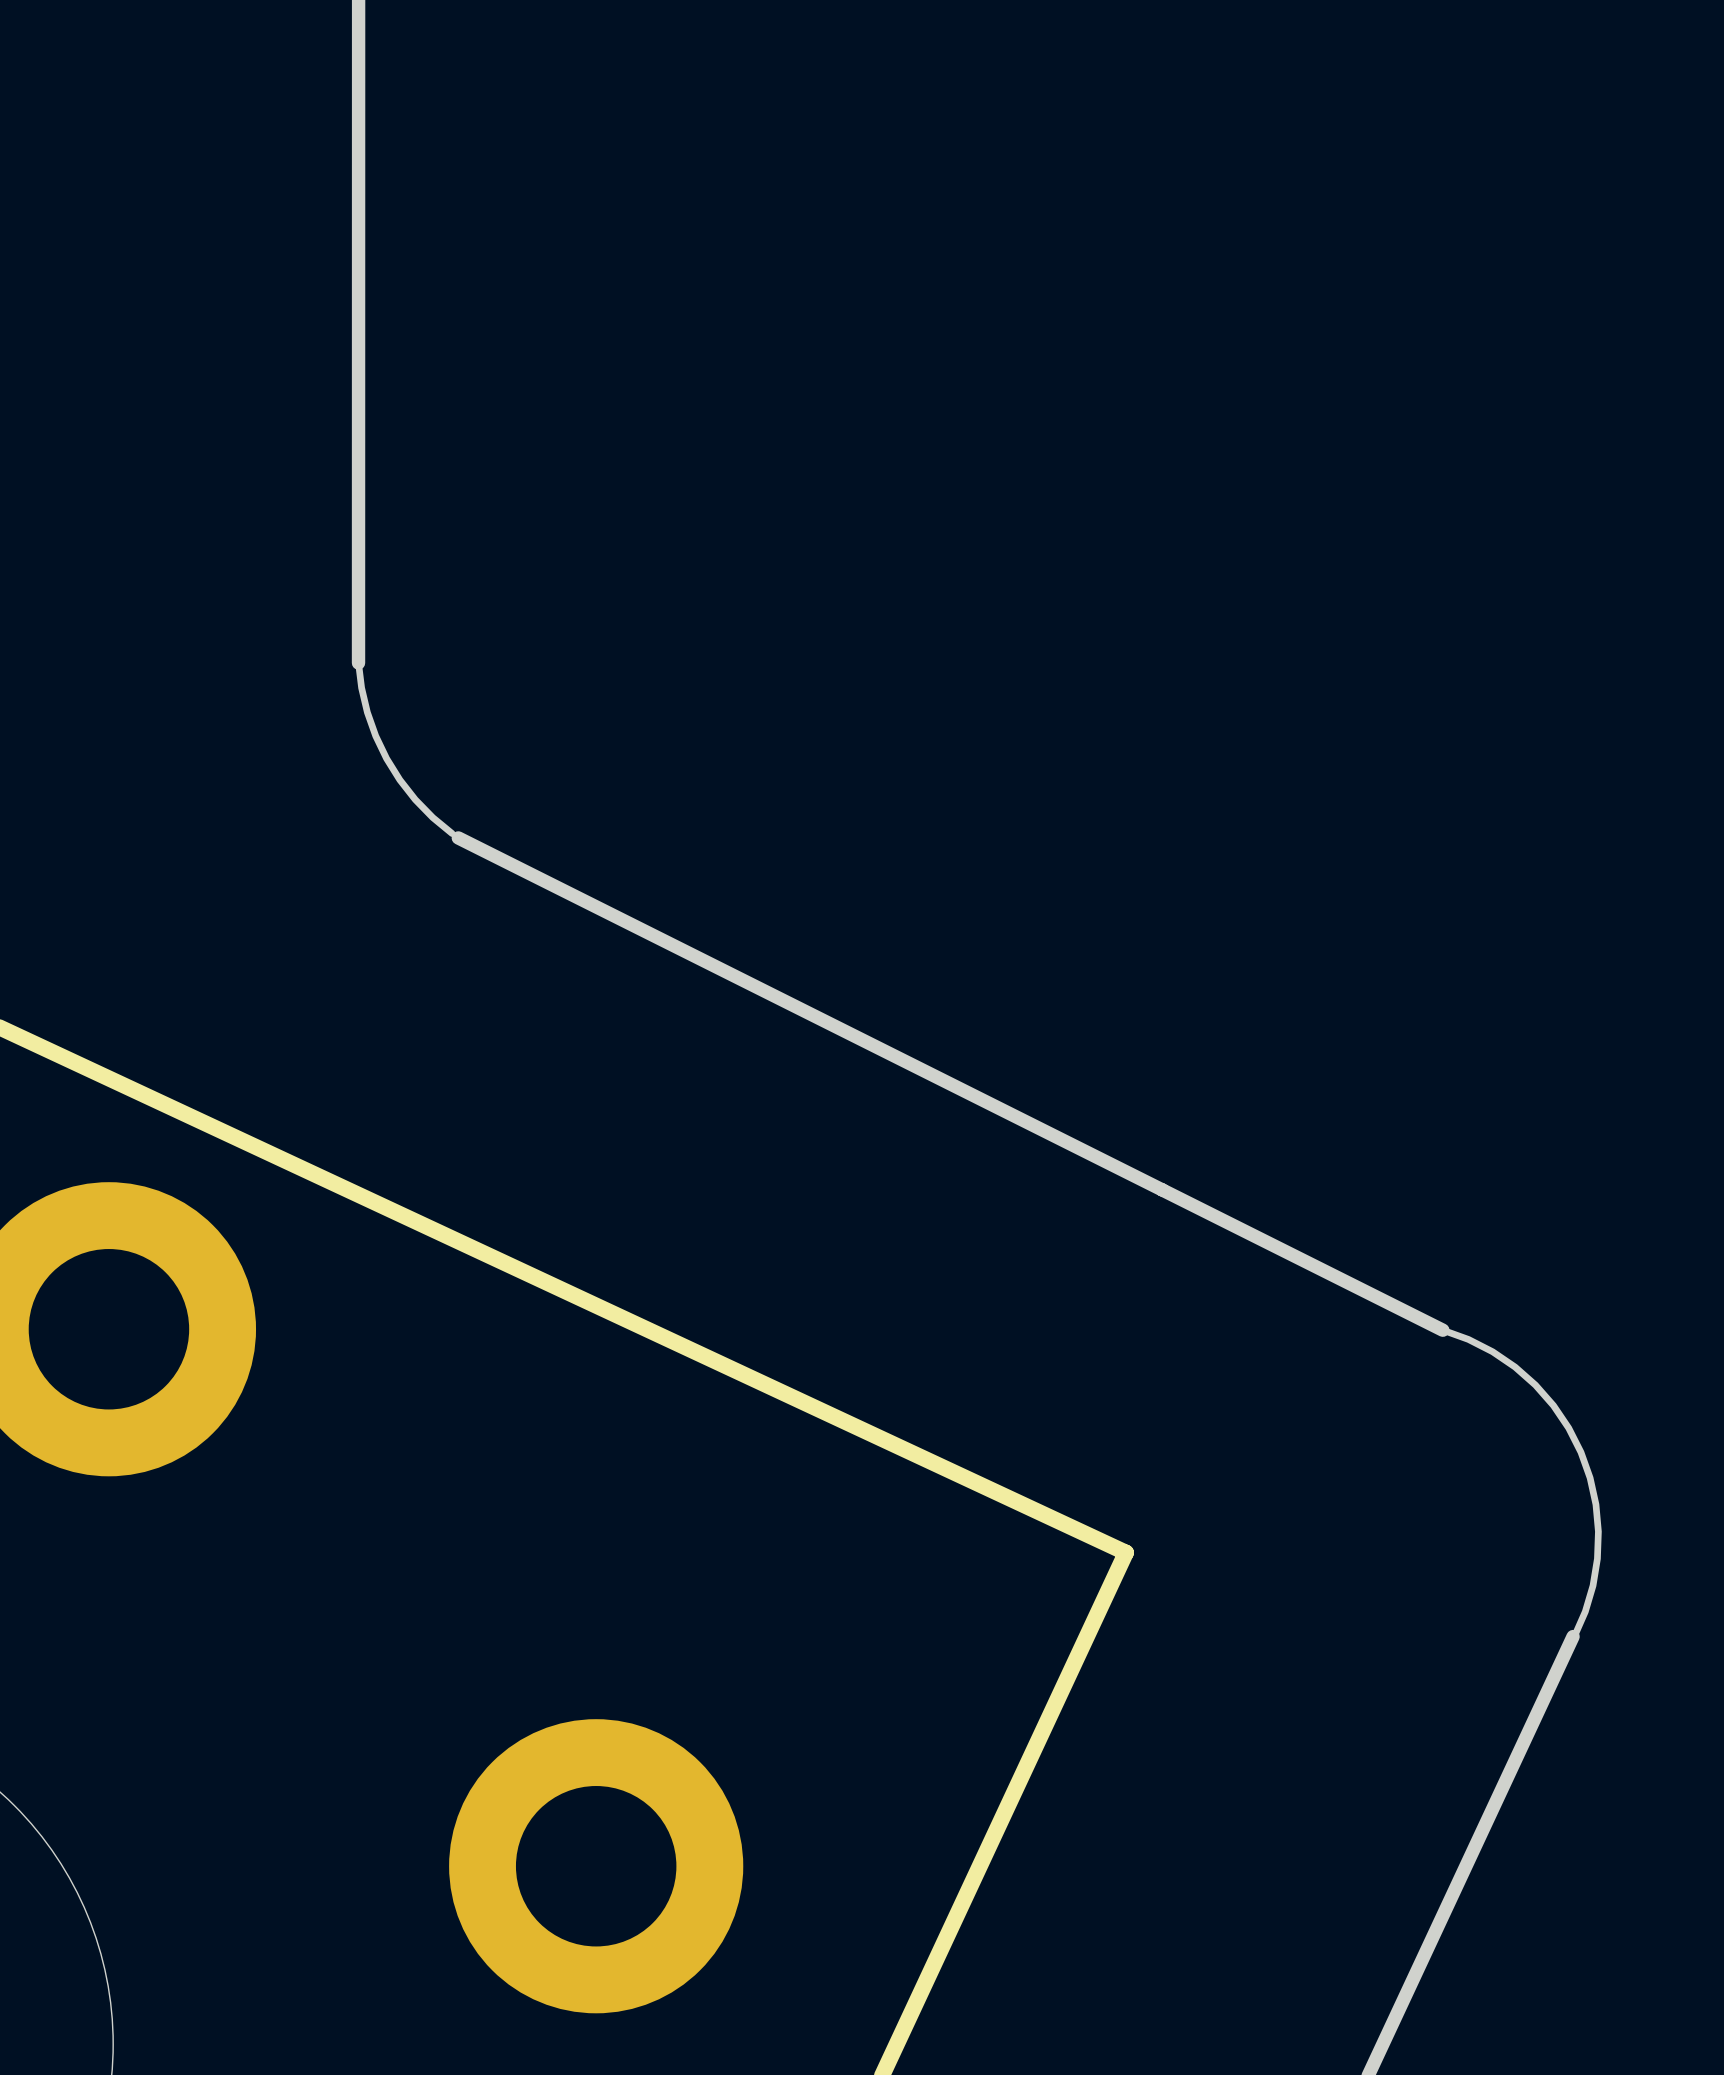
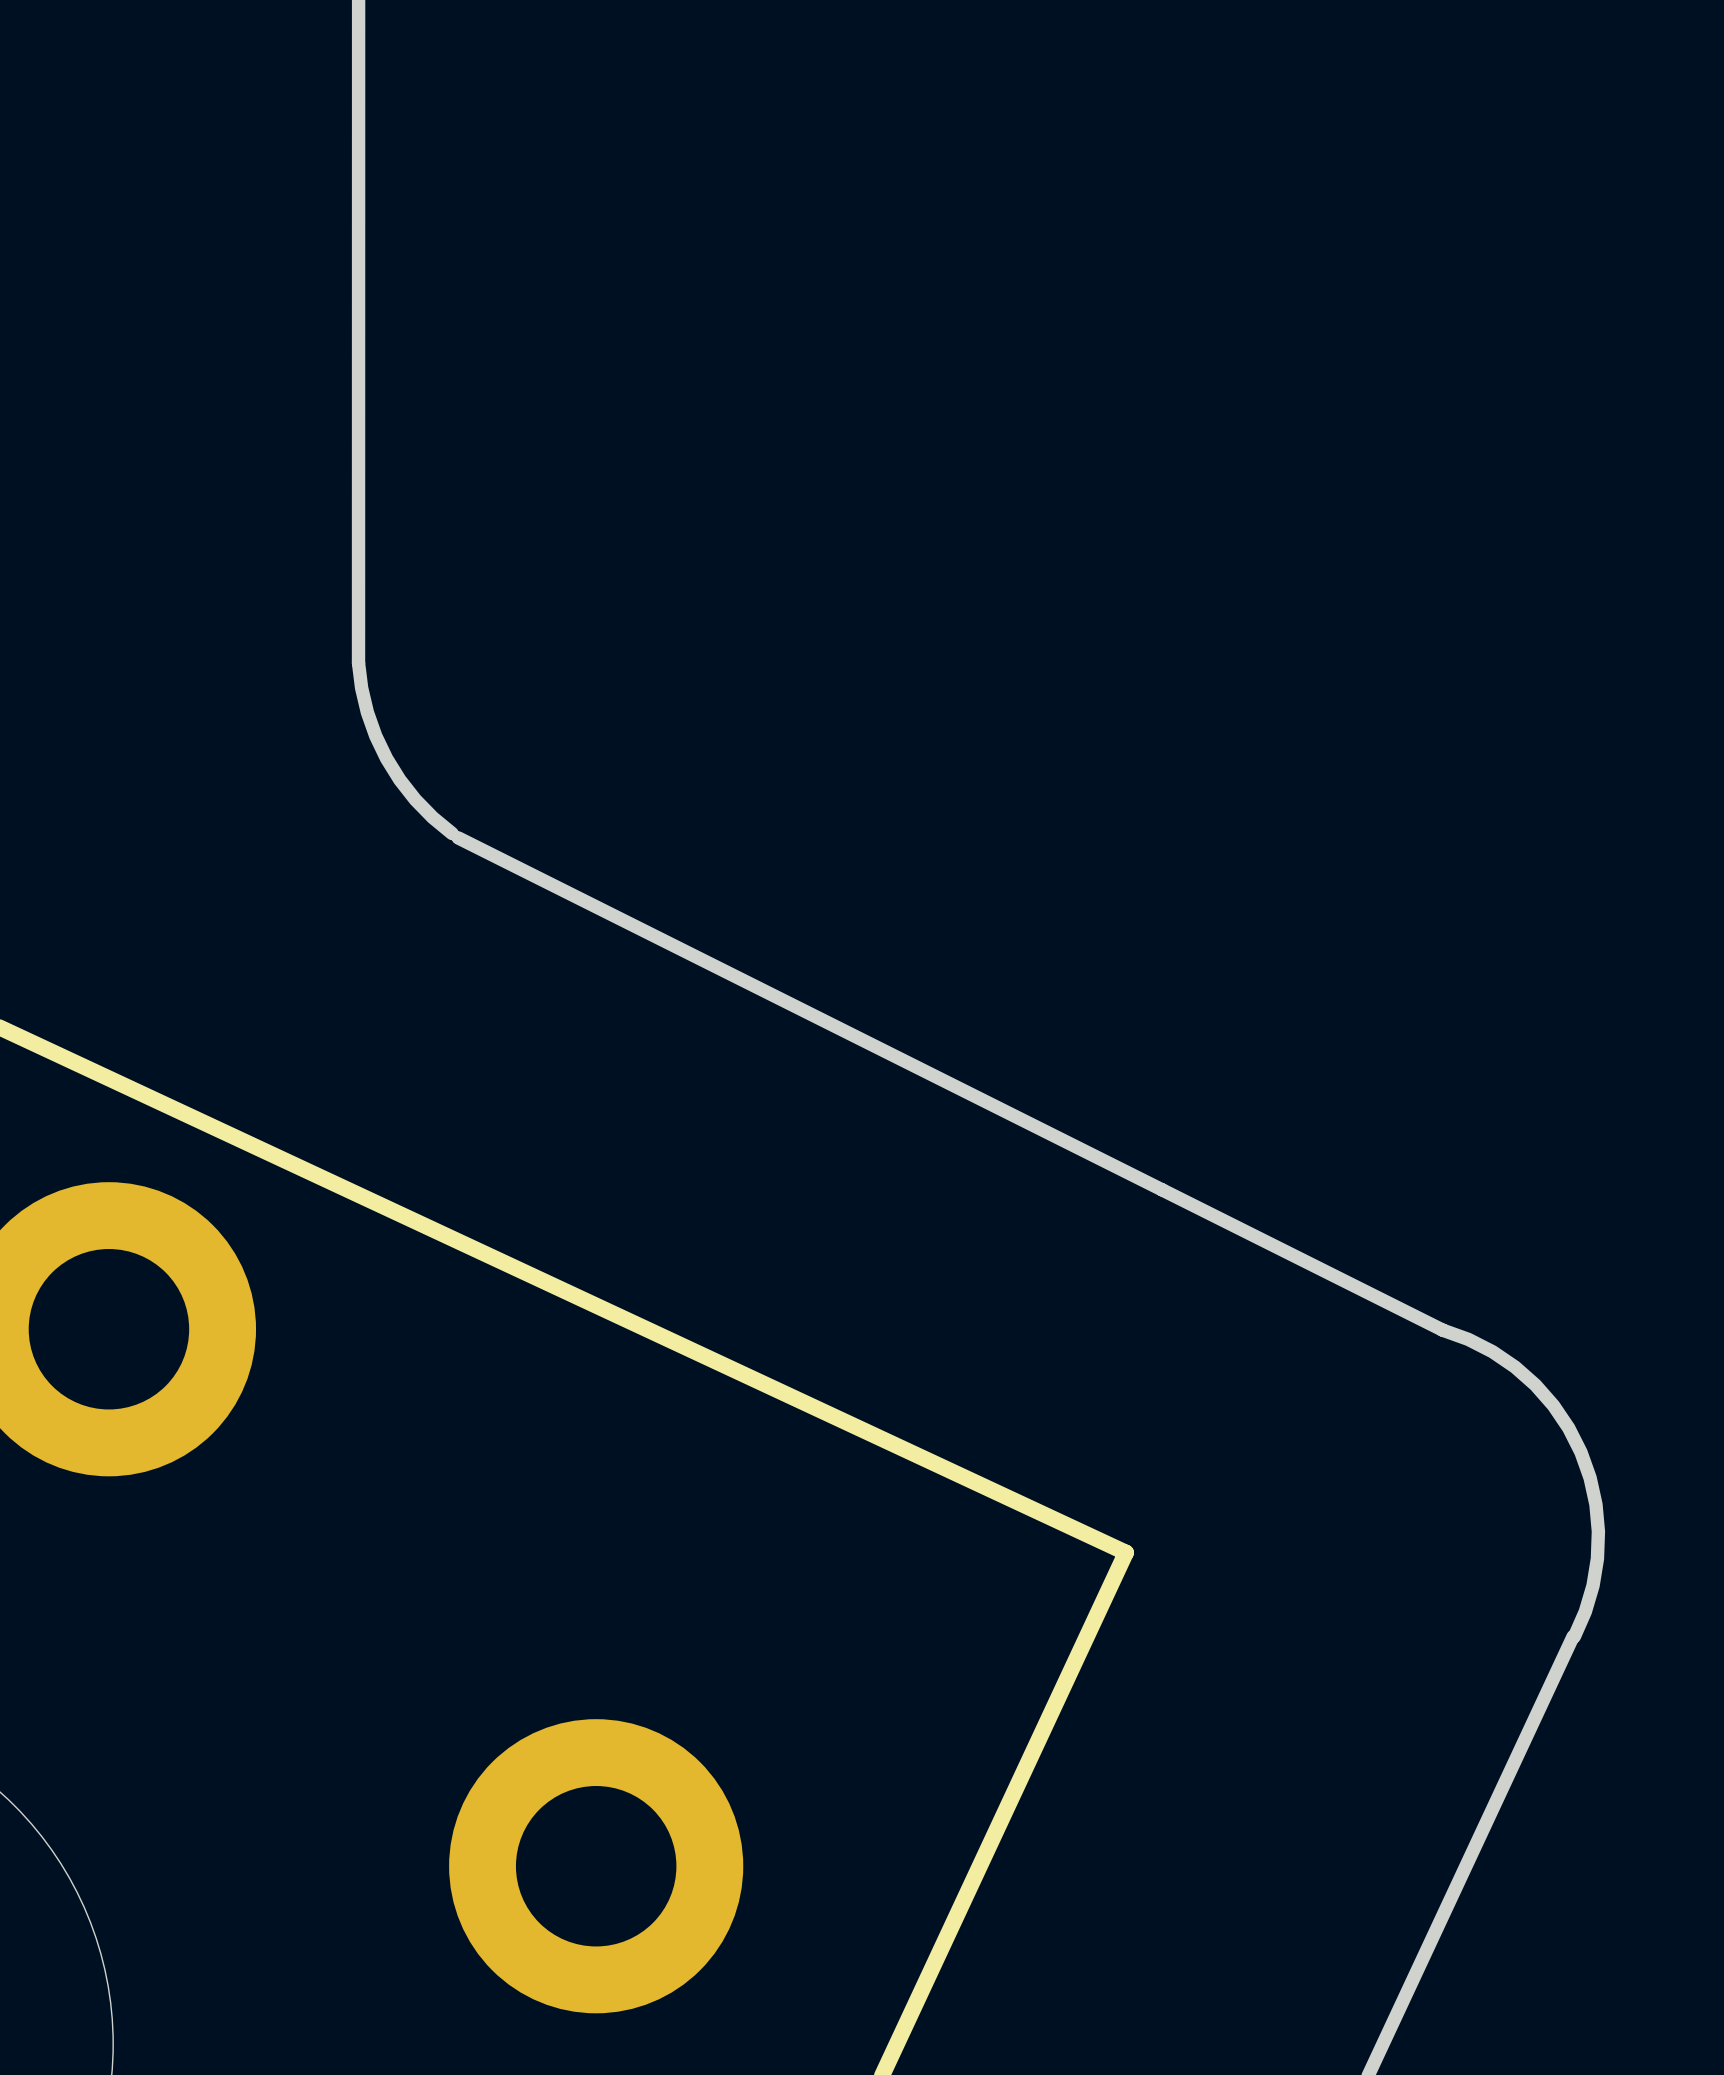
board edge width: thin (358, 663) (367, 712) (386, 758) (415, 799) (452, 833) -> thick (358, 663) (367, 712) (386, 758) (415, 799) (452, 833)
board edge width: thin (1442, 1330) (1468, 1339) (1492, 1351) (1515, 1367) (1535, 1385) (1553, 1405) (1568, 1428) (1580, 1452) (1590, 1477) (1595, 1504) (1598, 1531) (1597, 1558) (1593, 1585) (1585, 1611) (1574, 1636) -> thick (1442, 1330) (1468, 1339) (1492, 1351) (1515, 1367) (1535, 1385) (1553, 1405) (1568, 1428) (1580, 1452) (1590, 1477) (1595, 1504) (1598, 1531) (1597, 1558) (1593, 1585) (1585, 1611) (1574, 1636)

